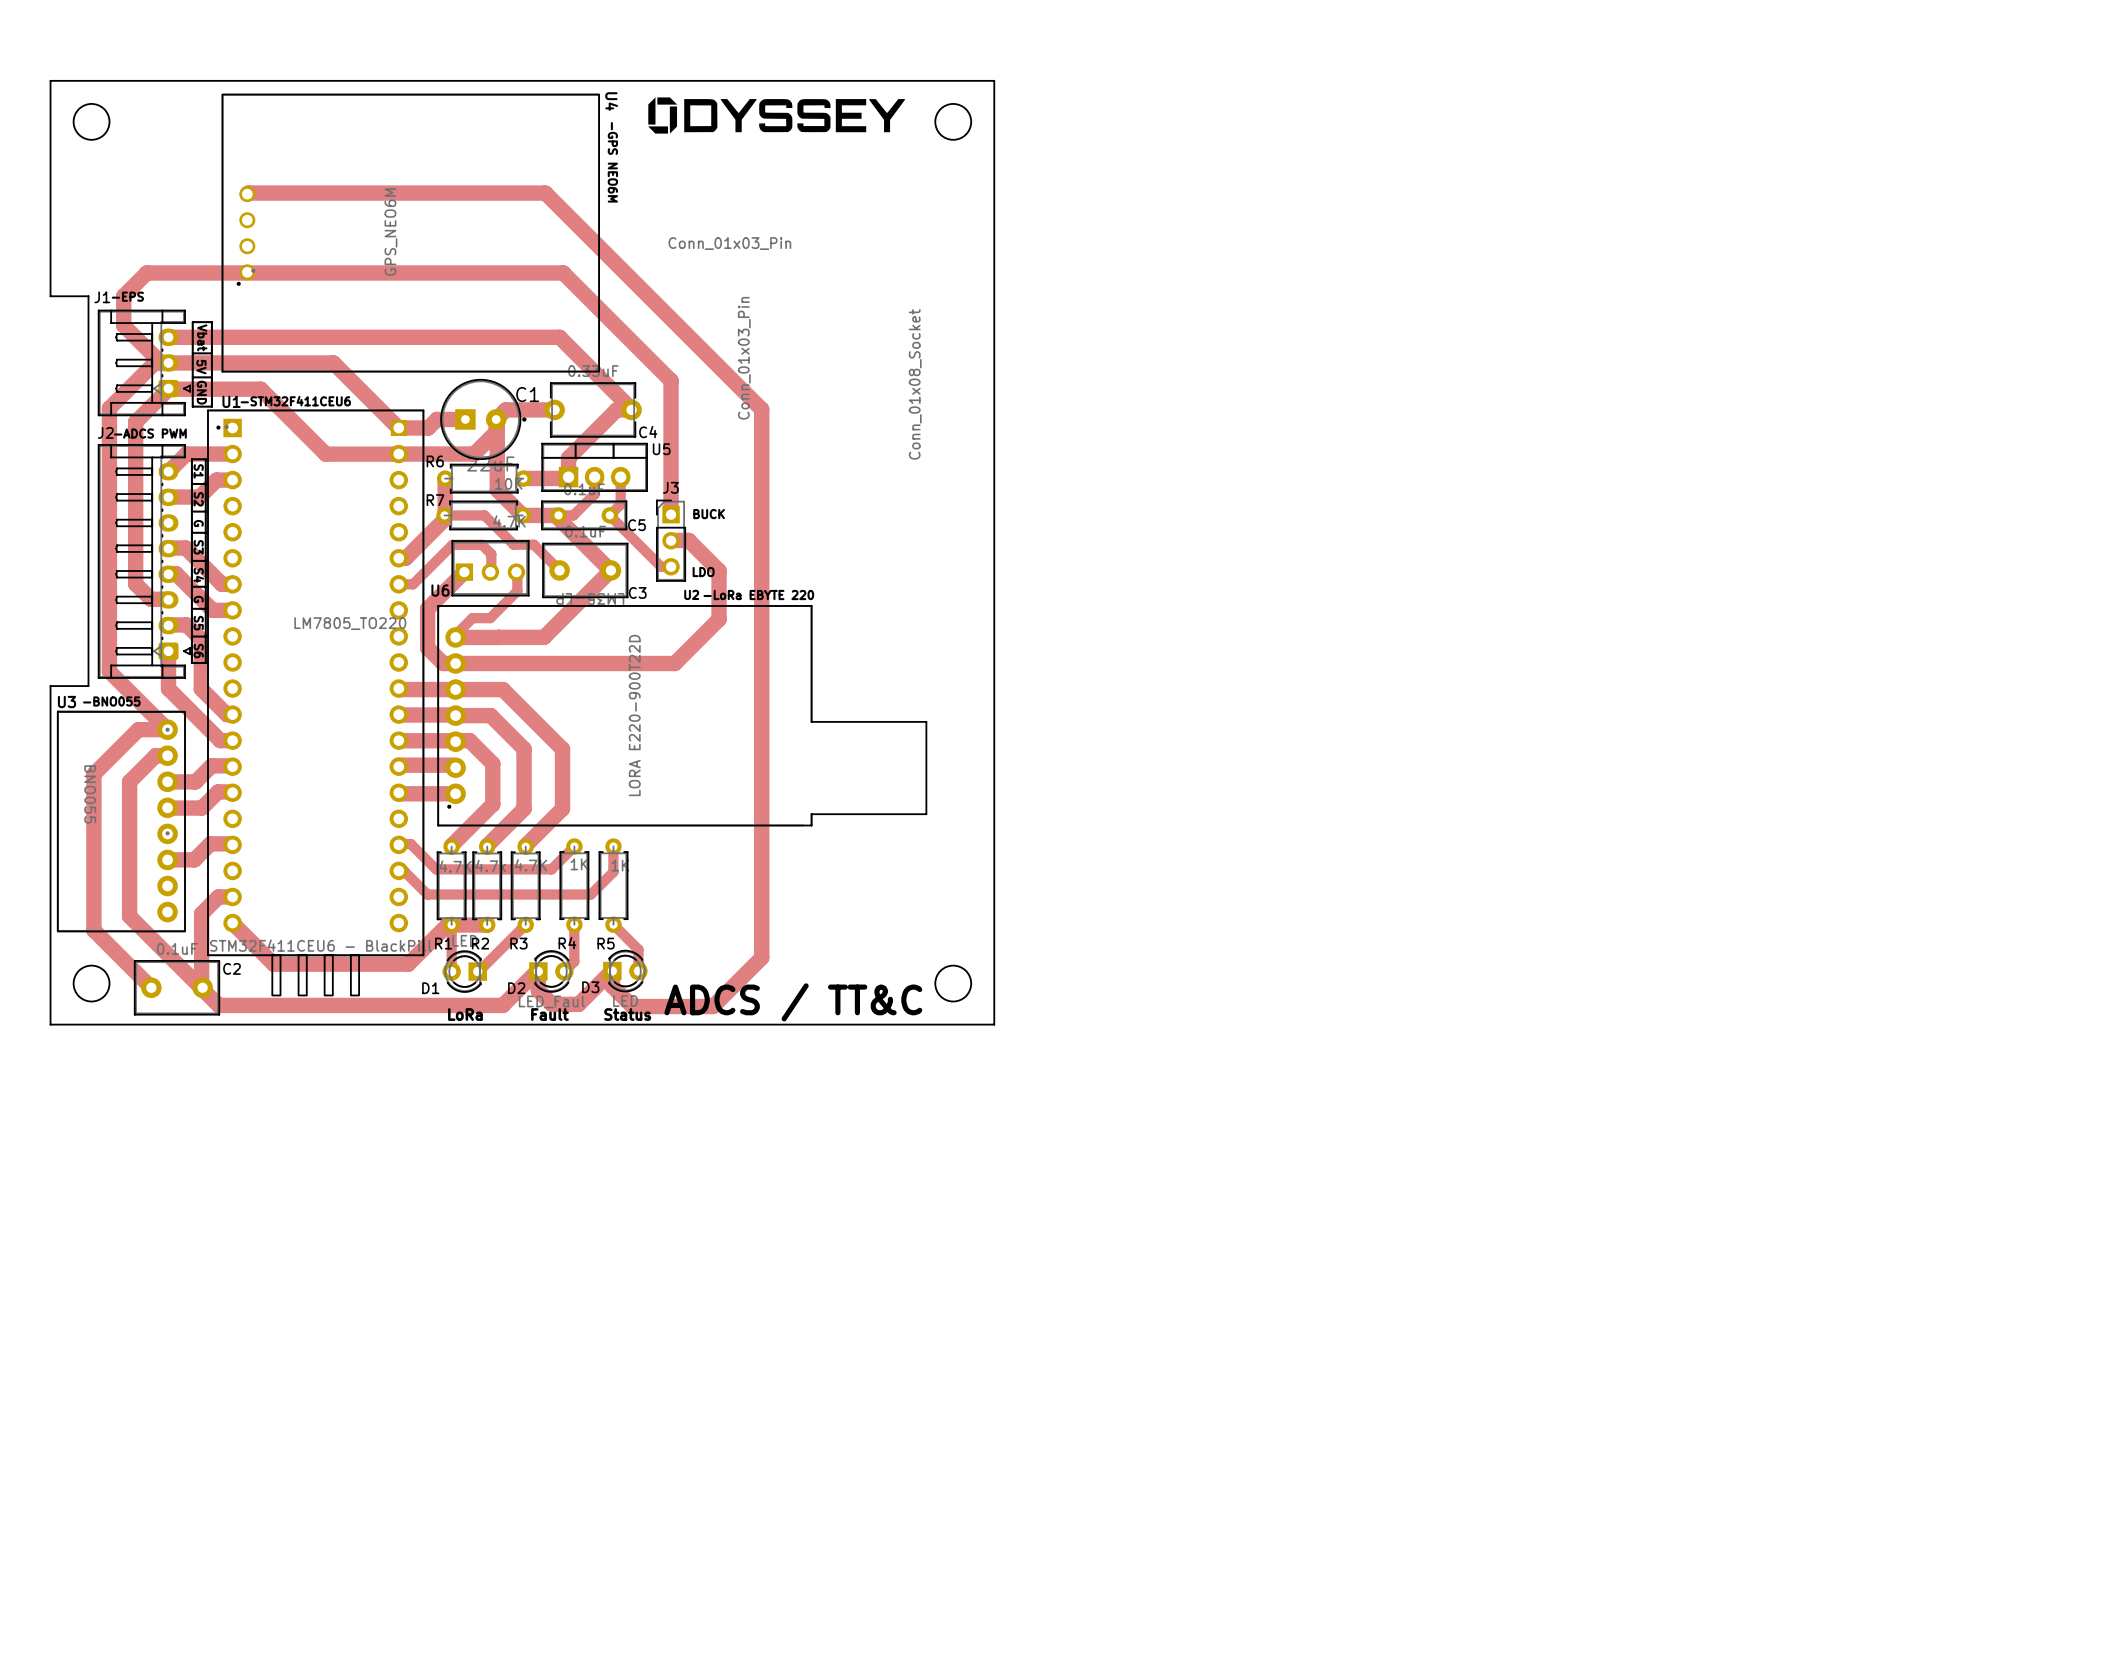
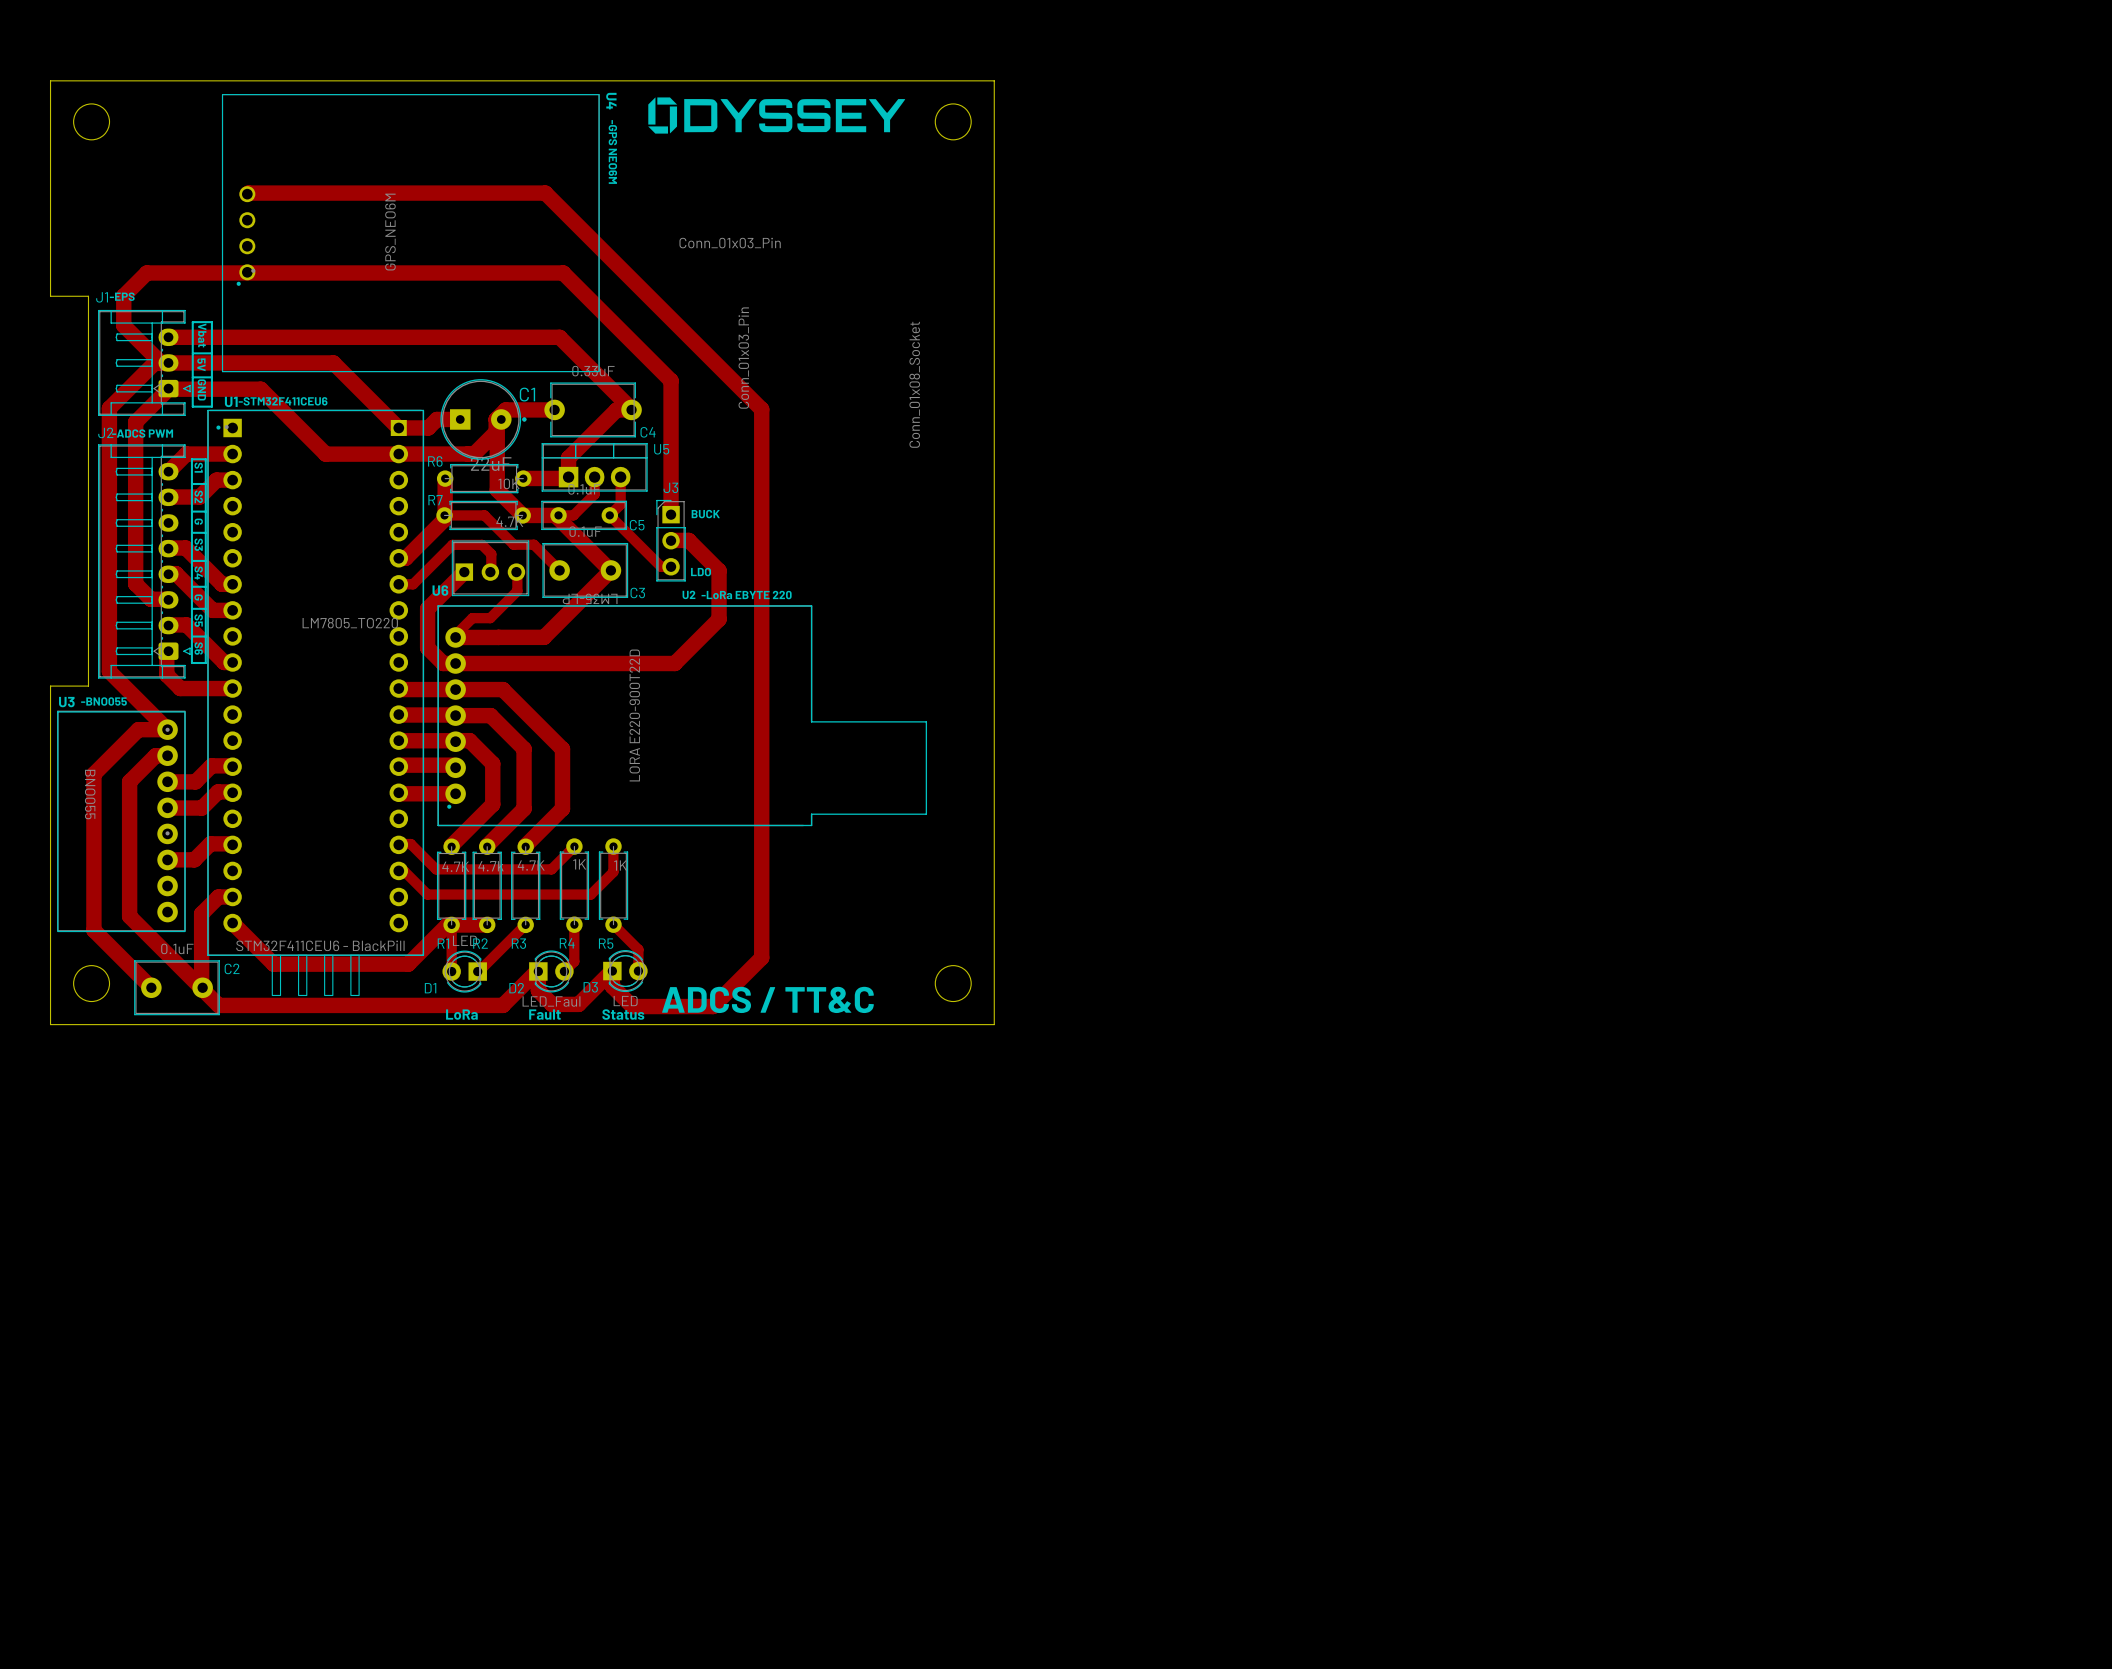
C1 footprint: [440, 379, 527, 460] -> [440, 379, 527, 460]
top track: (201, 639) (201, 689) (226, 714) (232, 714) -> (201, 639) (224, 662) (232, 662)
top track: none -> (166, 650) (166, 674) (180, 688) (232, 688)
top track: (168, 651) (168, 688) (220, 740) (232, 740) -> none

